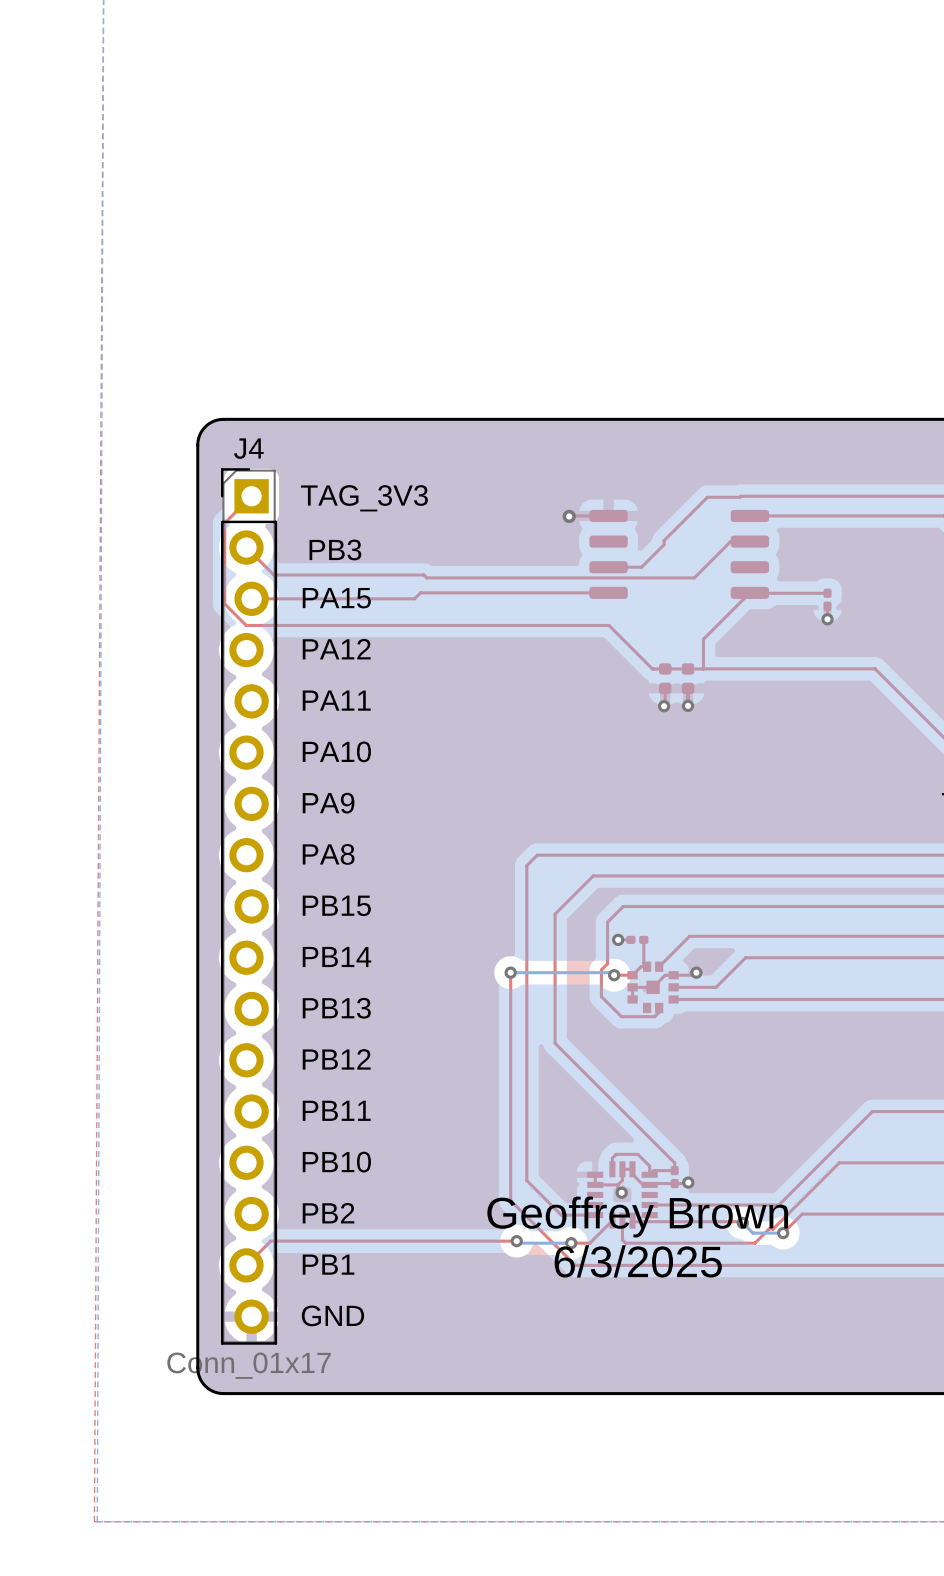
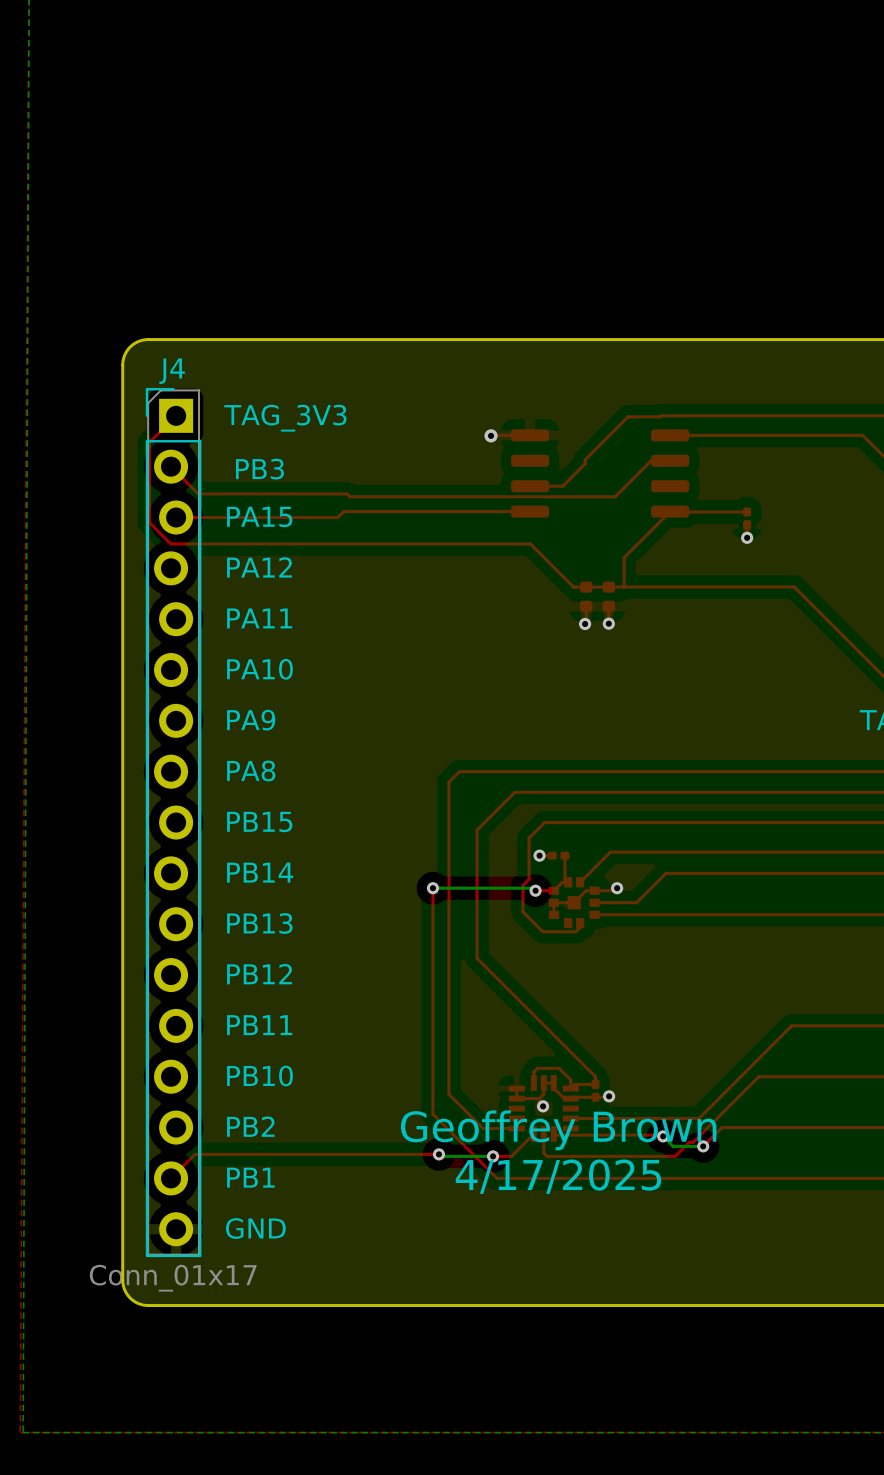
text: 6/3/2025 (638, 1261) -> 4/17/2025 (558, 1176)

